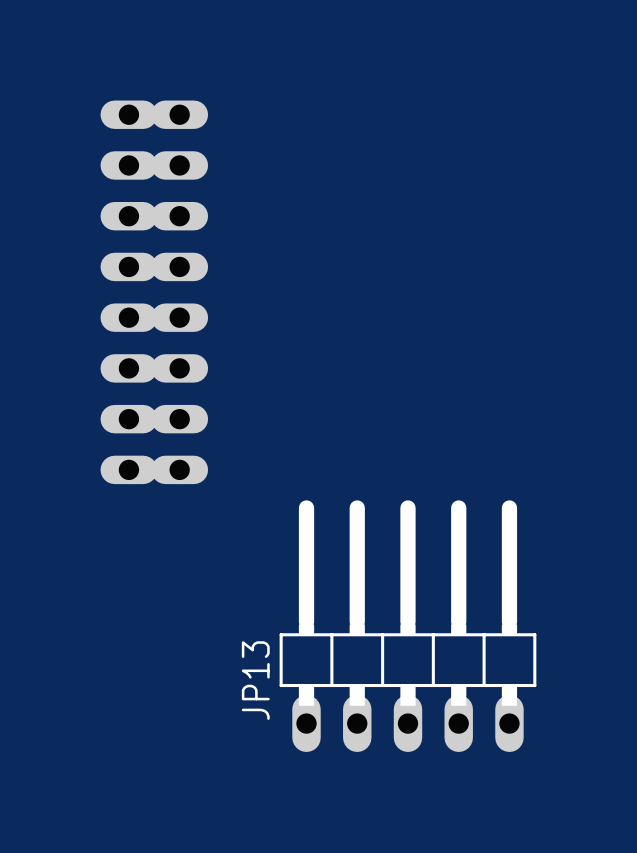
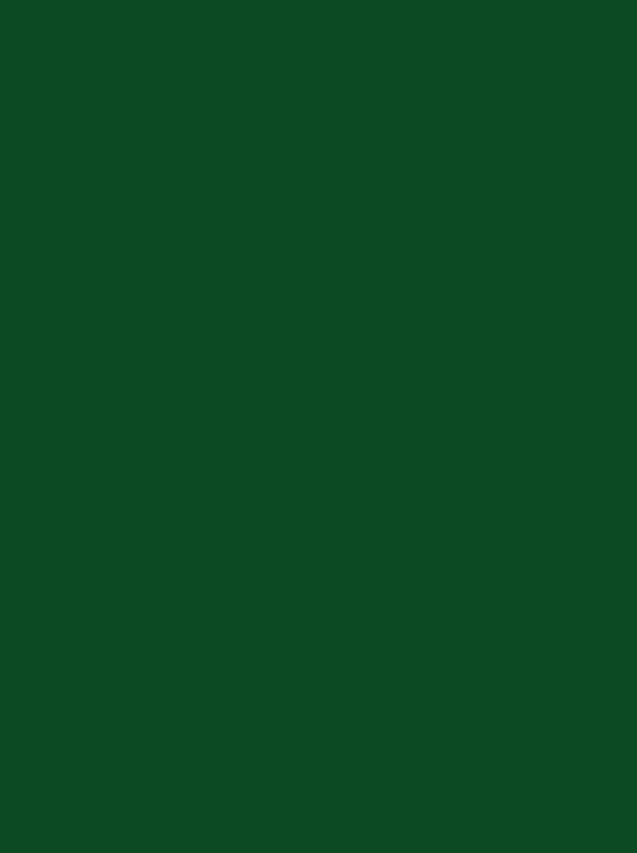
part: (128, 292) -> none
part: (179, 292) -> none
JP13: (407, 626) -> none

